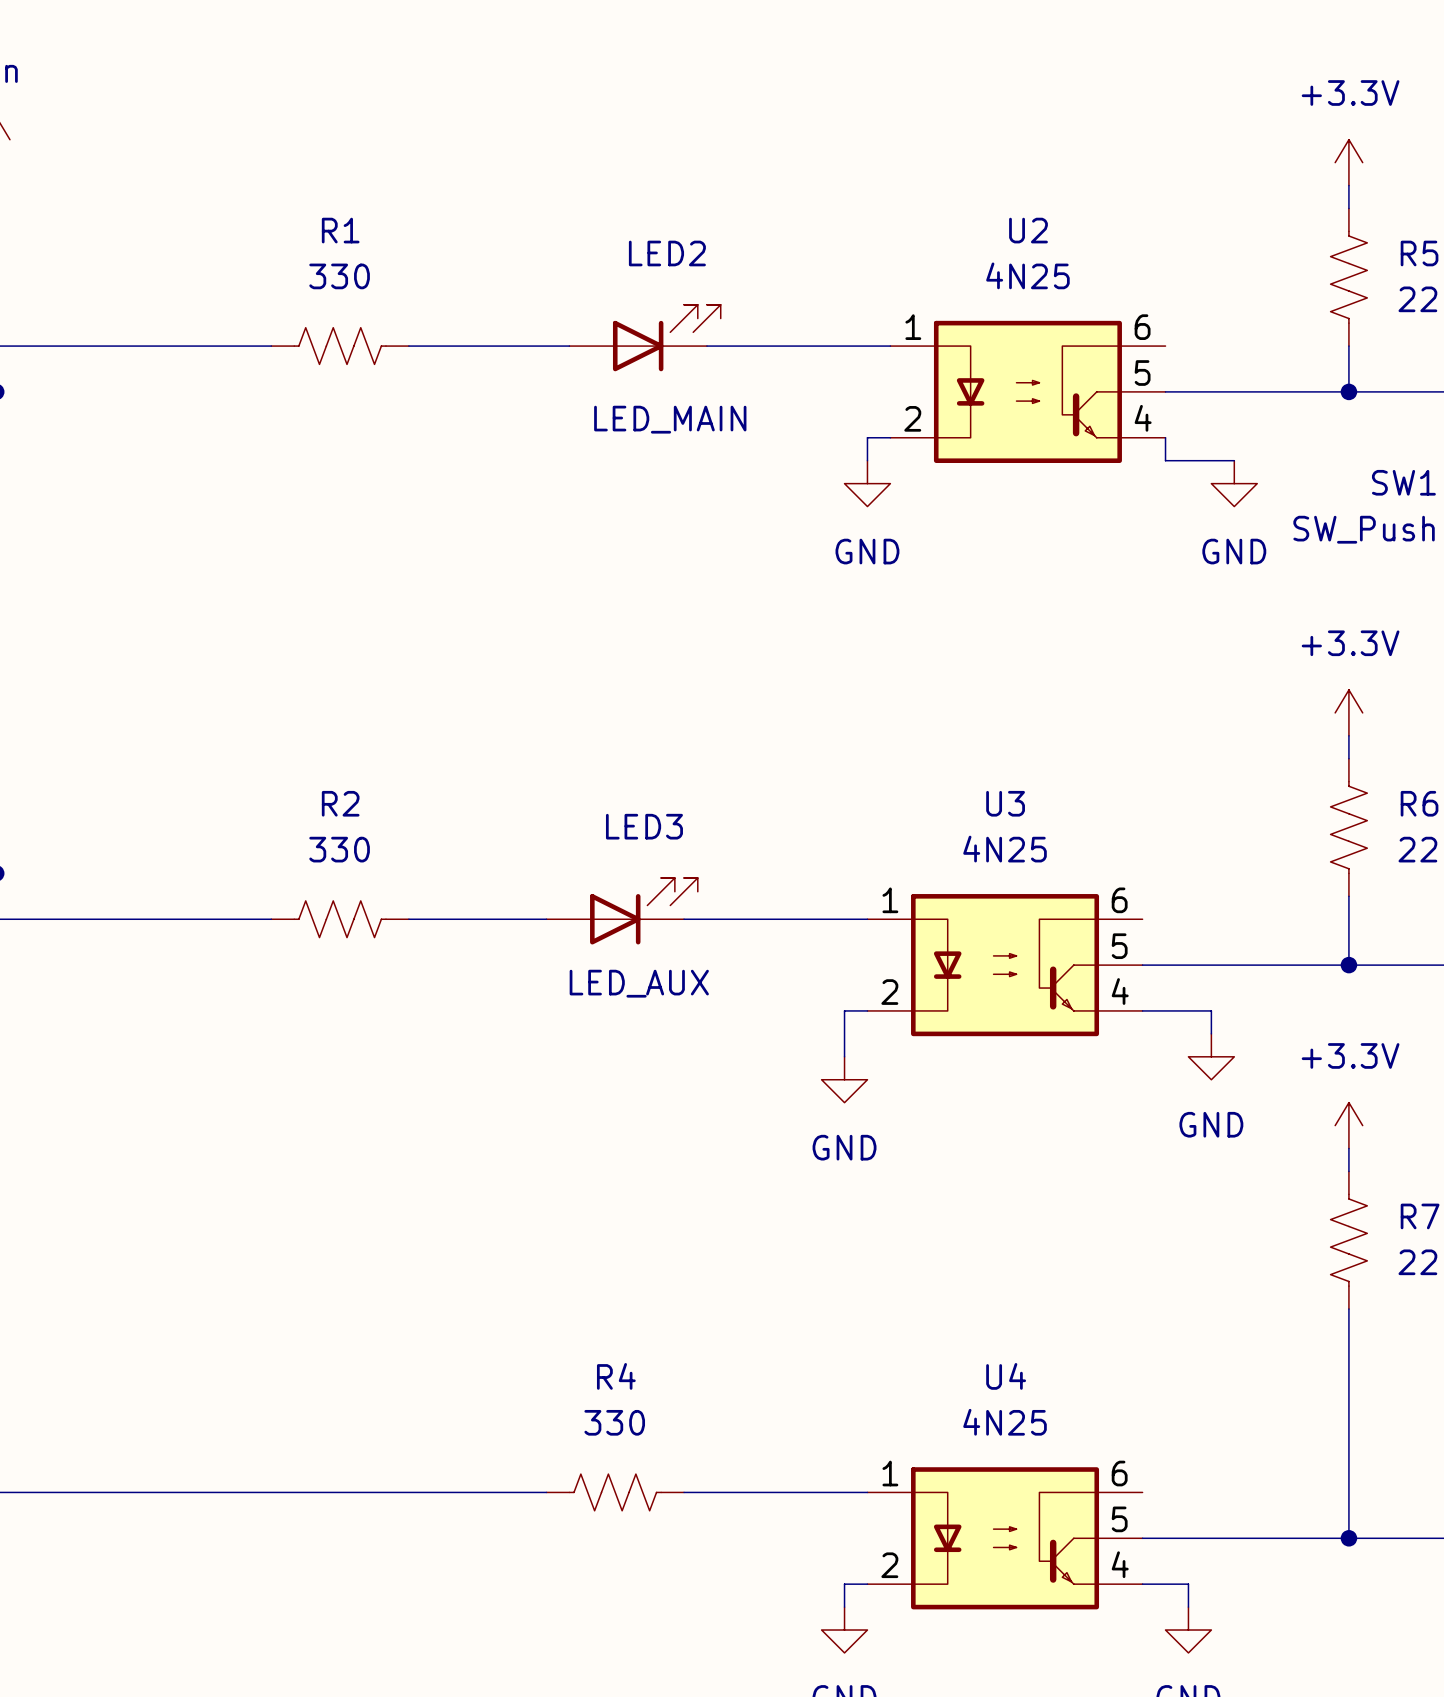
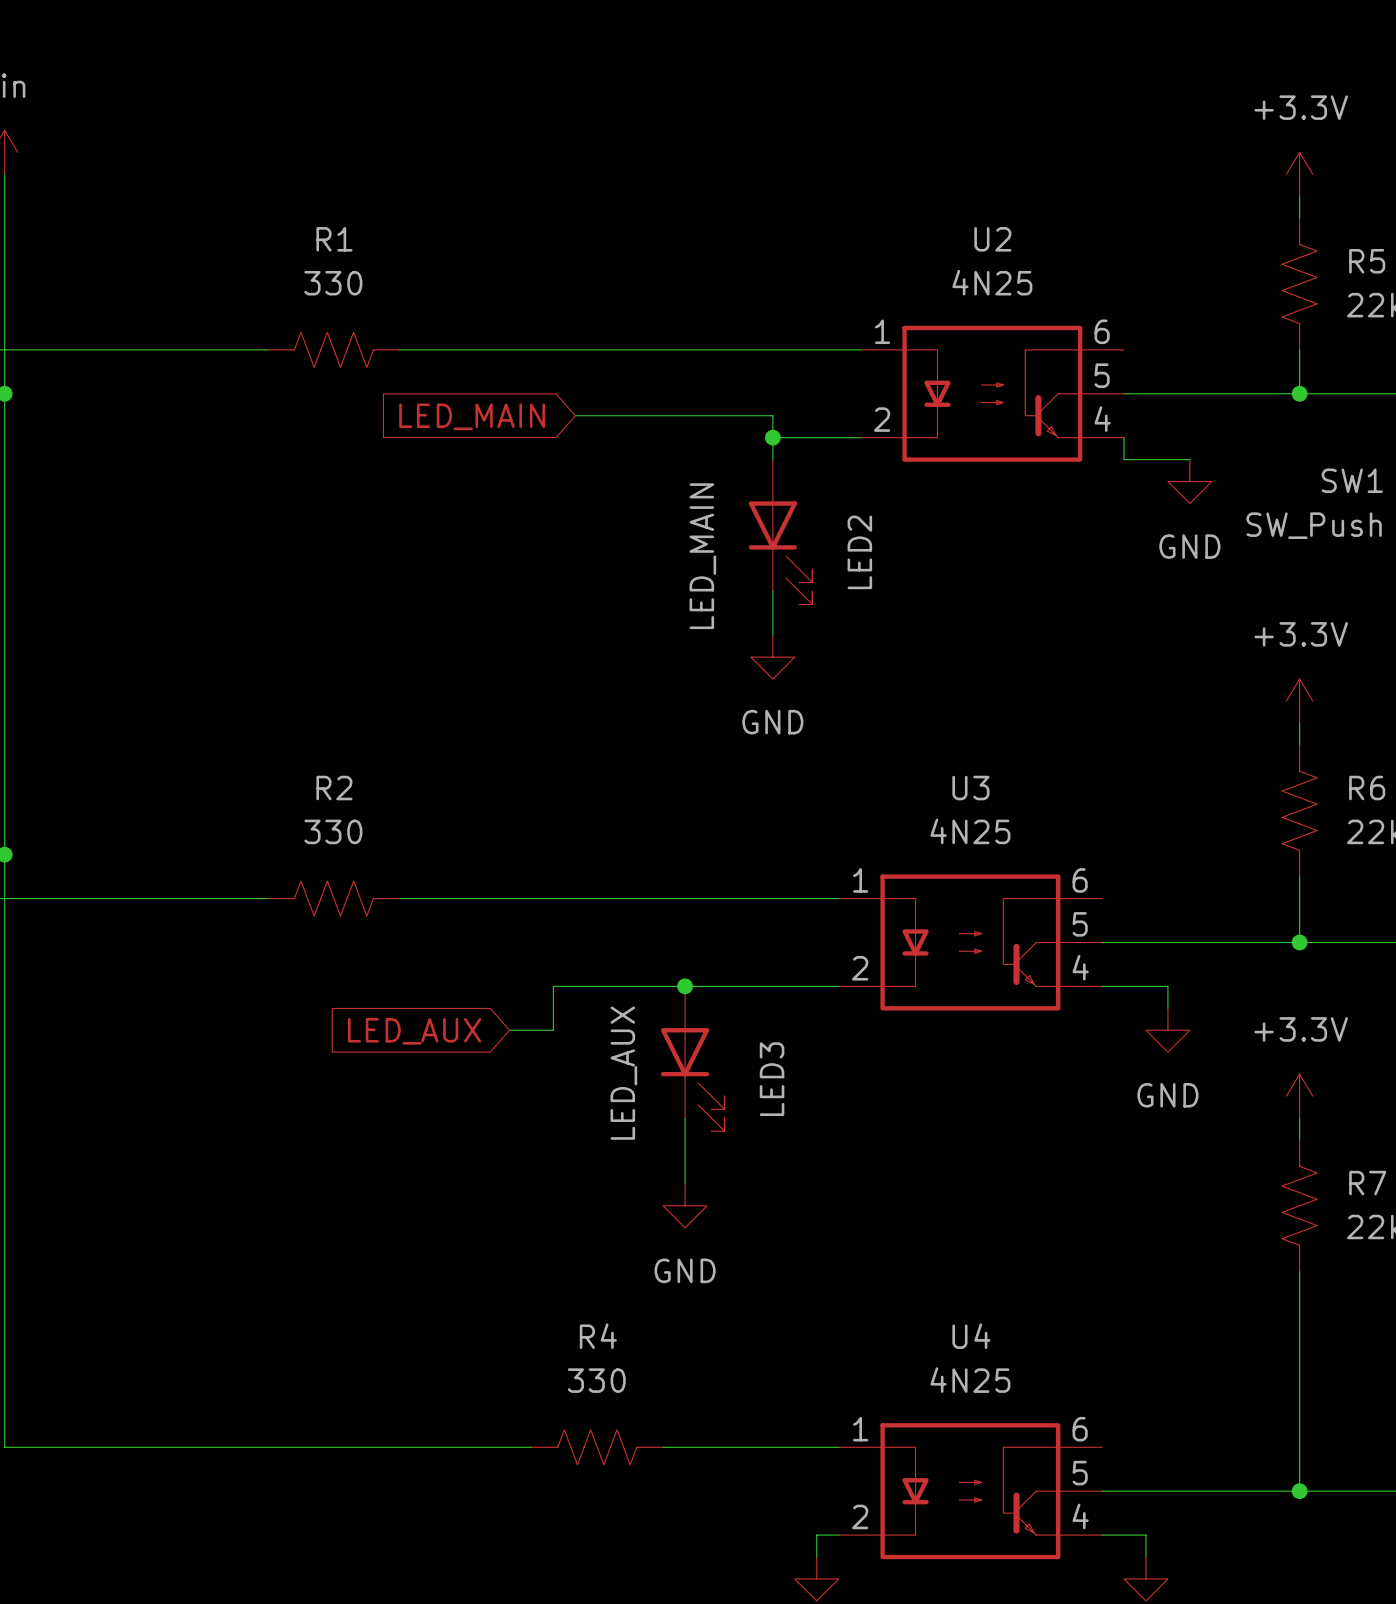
LED2 position: (645, 338) -> (780, 532)
LED2 rotation: 0° (666, 338) -> 90° clockwise (780, 552)
wire: none -> (575, 415) (772, 415) (772, 459)
global label: none -> LED_MAIN (472, 416)
junction: none -> (772, 437)
wire: (867, 437) (867, 460) -> (838, 437) (772, 437)
power symbol position: GND (867, 483) -> GND (772, 657)
wire: none -> (772, 591) (772, 635)
LED3 position: (622, 911) -> (692, 1058)
LED3 rotation: 0° (643, 911) -> 90° clockwise (692, 1079)
junction: none -> (685, 986)
wire: (844, 1010) (844, 1056) -> (816, 986) (553, 986) (553, 1030) (509, 1030)
global label: none -> LED_AUX (414, 1031)
power symbol: GND (844, 1079) -> none
wire: none -> (685, 1118) (685, 1183)
power symbol: none -> GND (685, 1205)

